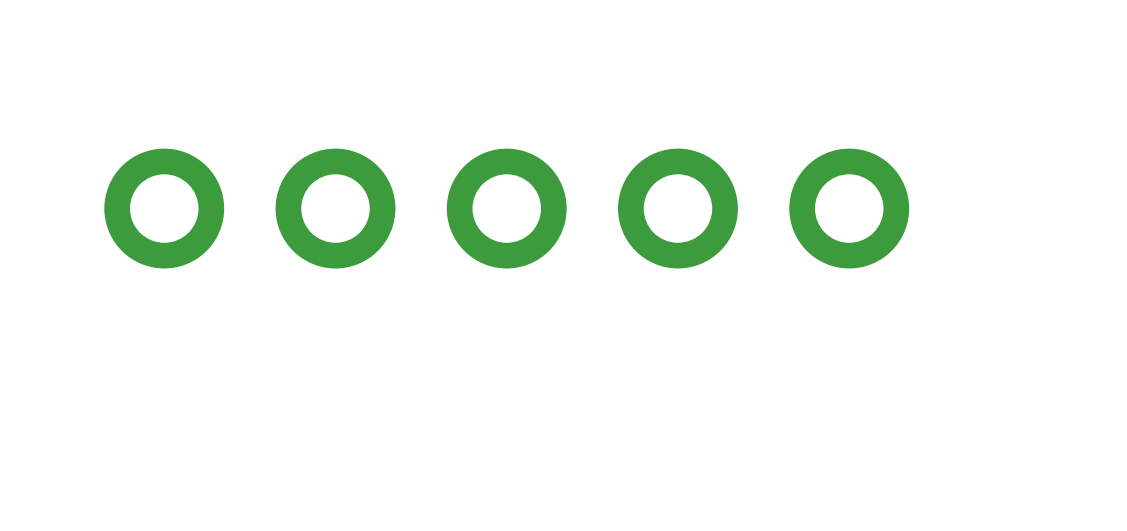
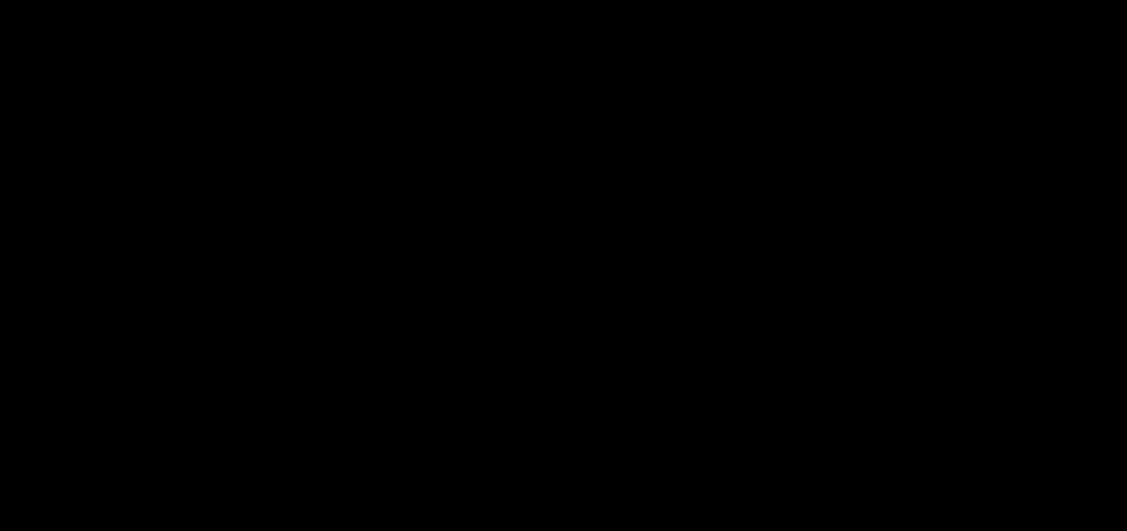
part: (506, 208) -> none

